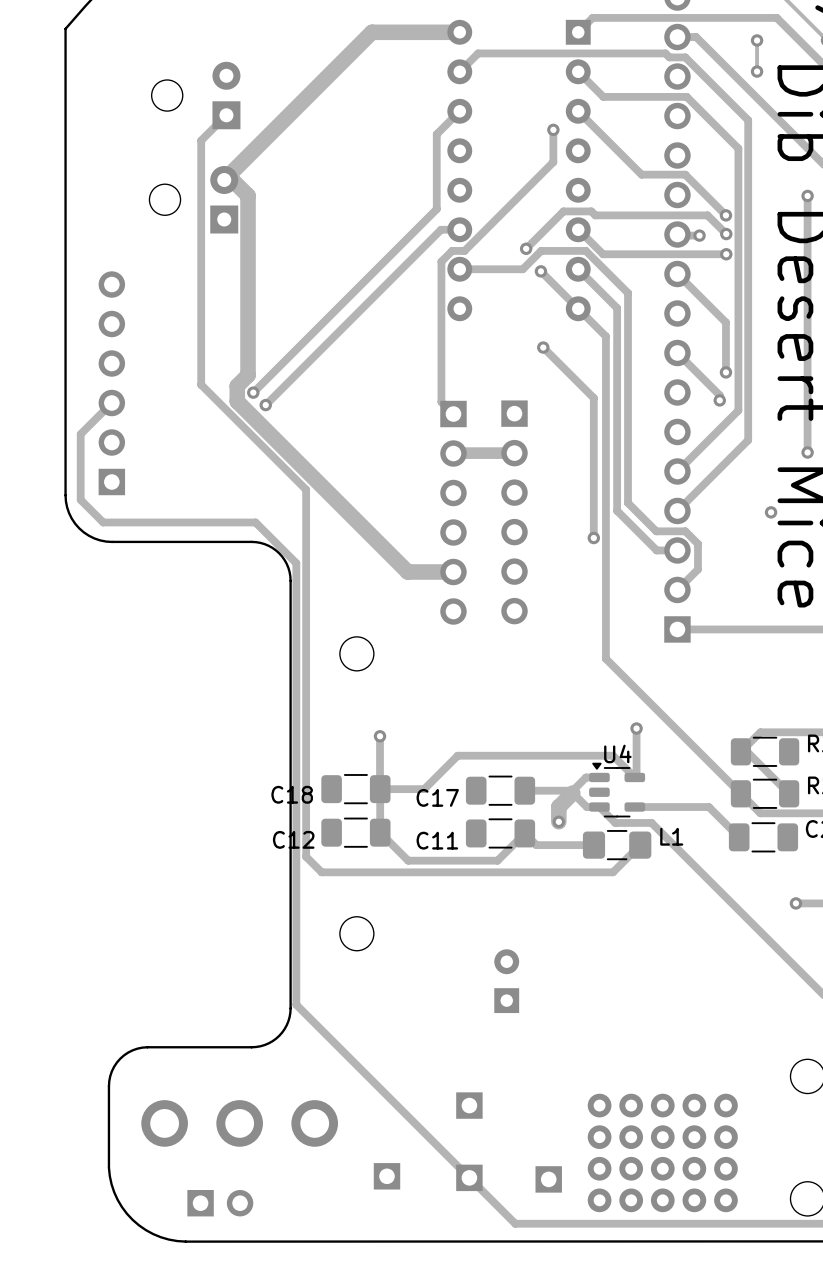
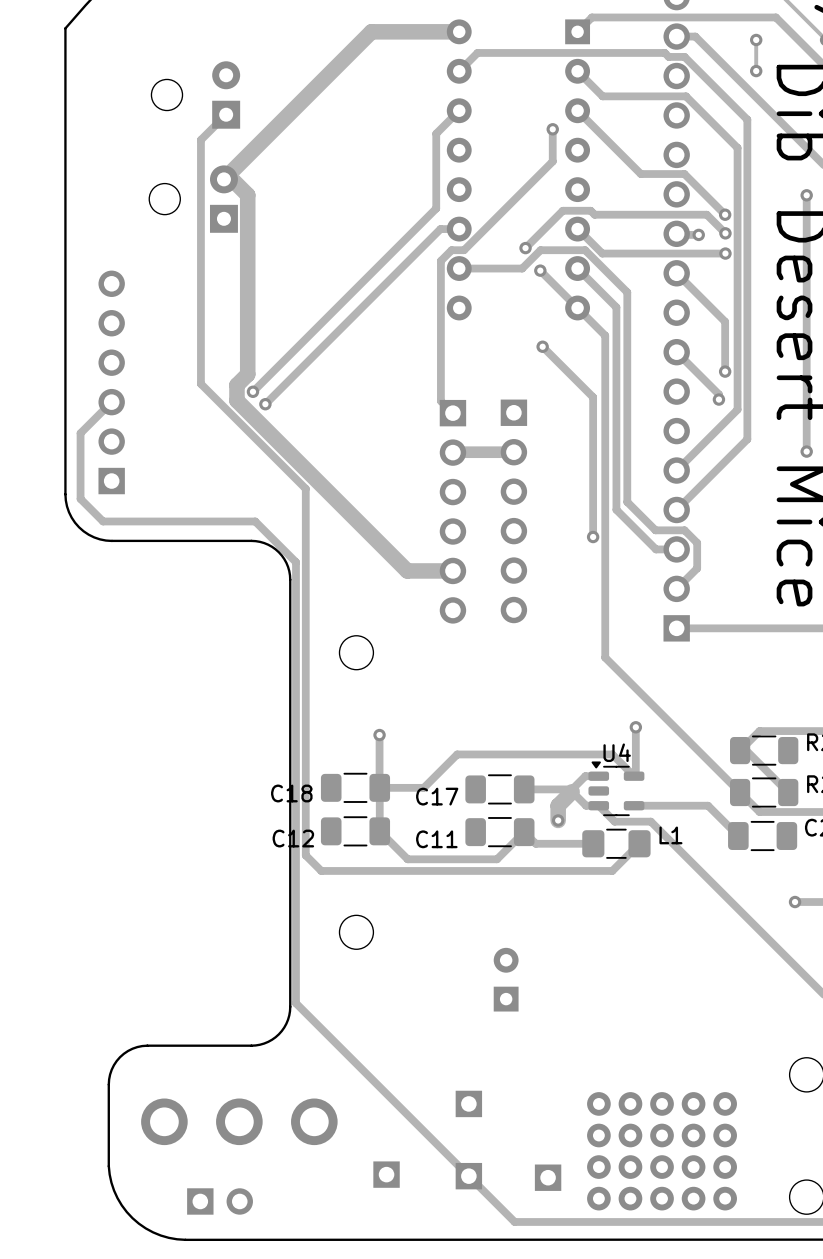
via: (771, 512) -> none

